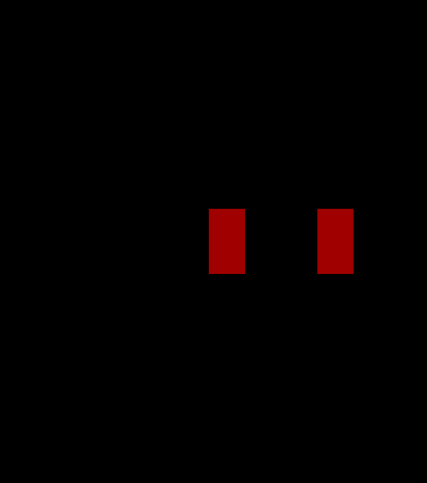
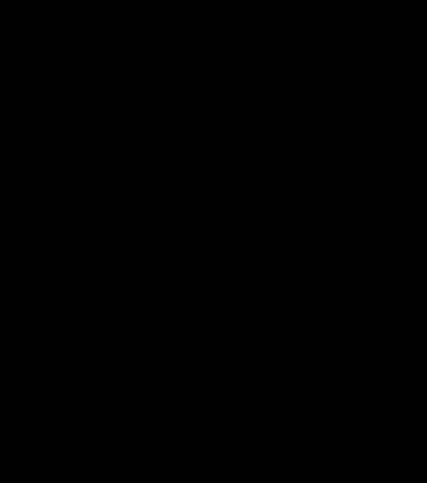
part: (281, 241) -> none

